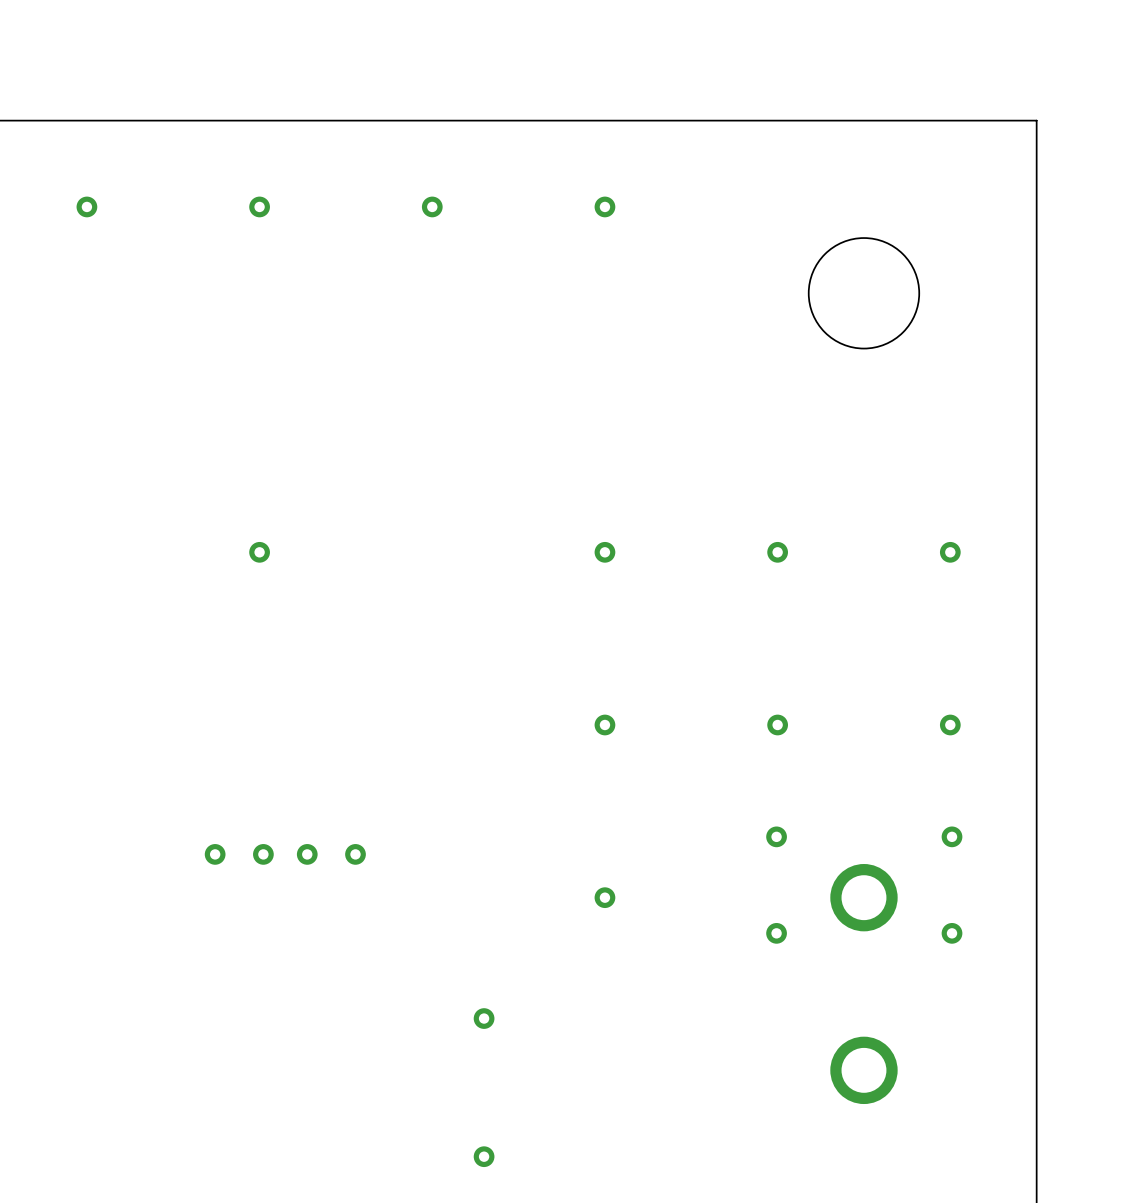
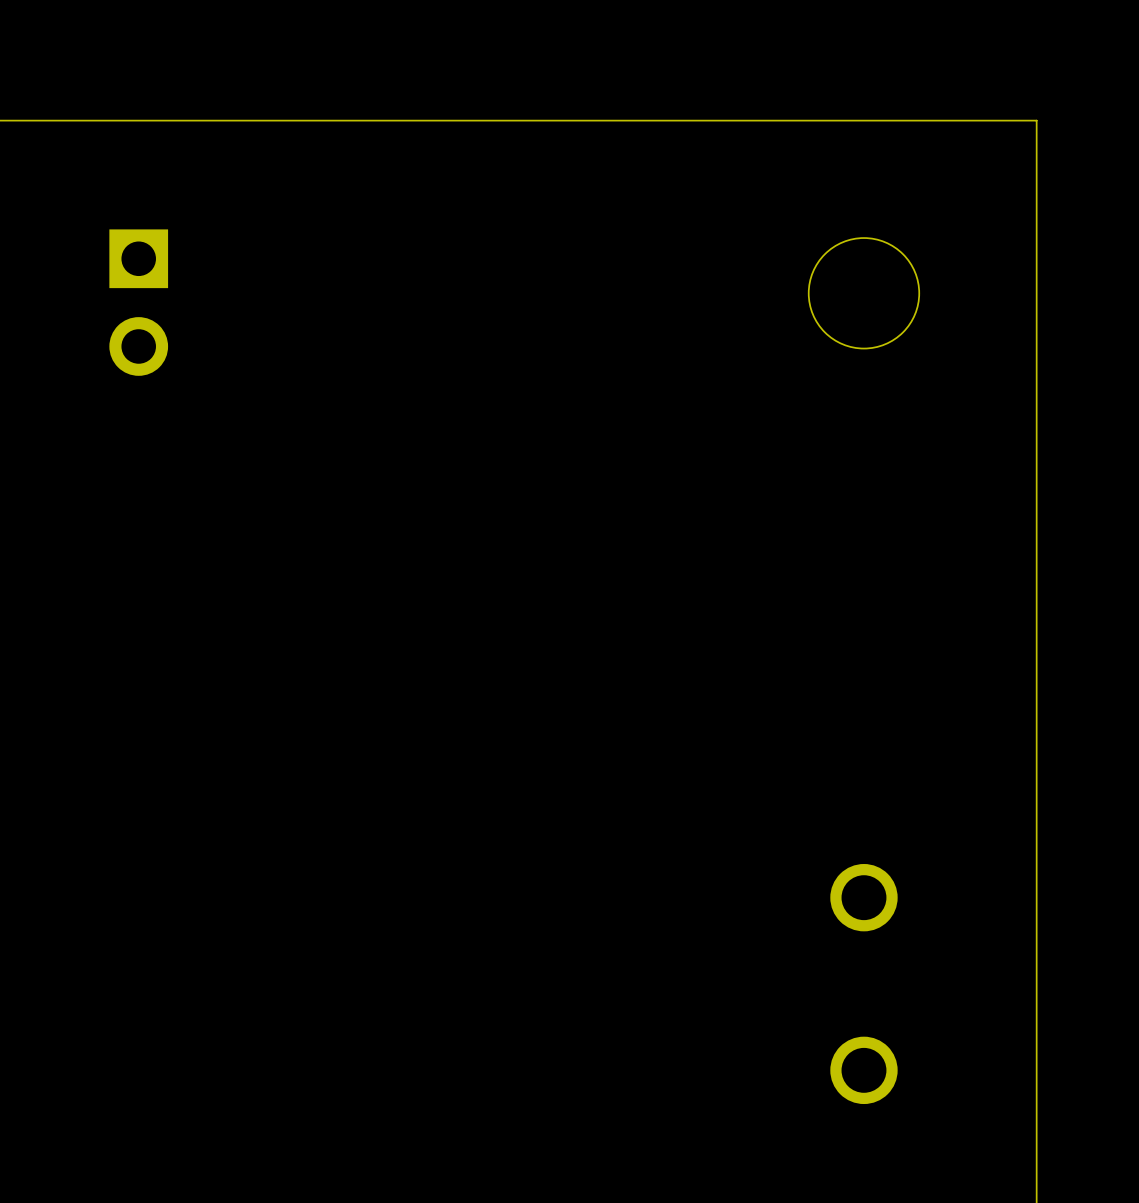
via: (86, 206) -> none
via: (259, 206) -> none
via: (432, 206) -> none
via: (604, 206) -> none
part: none -> (138, 302)
via: (259, 552) -> none
via: (604, 552) -> none
via: (777, 552) -> none
via: (950, 552) -> none
via: (604, 724) -> none
via: (777, 724) -> none
via: (950, 724) -> none
via: (776, 836) -> none
via: (952, 836) -> none
via: (215, 854) -> none
via: (263, 854) -> none
via: (307, 854) -> none
via: (355, 854) -> none
via: (604, 897) -> none
via: (776, 933) -> none
via: (952, 933) -> none
via: (484, 1018) -> none
via: (484, 1156) -> none

